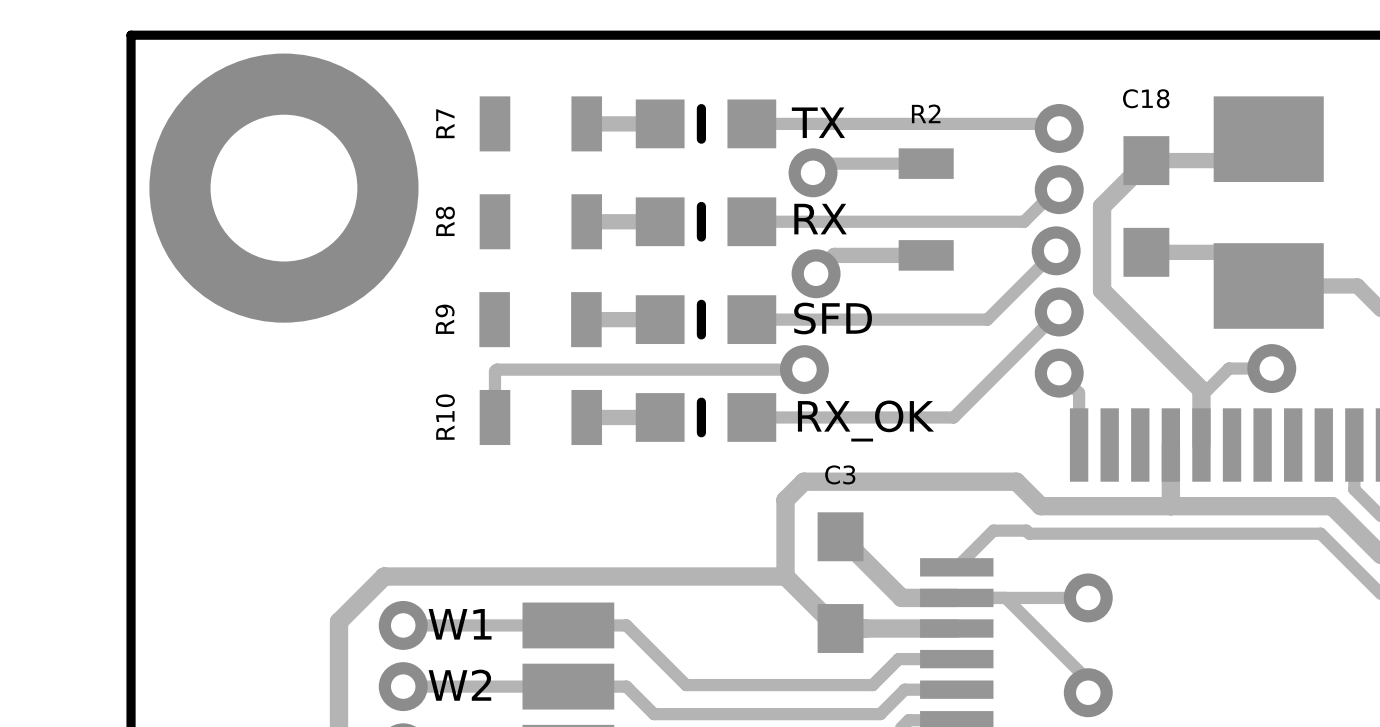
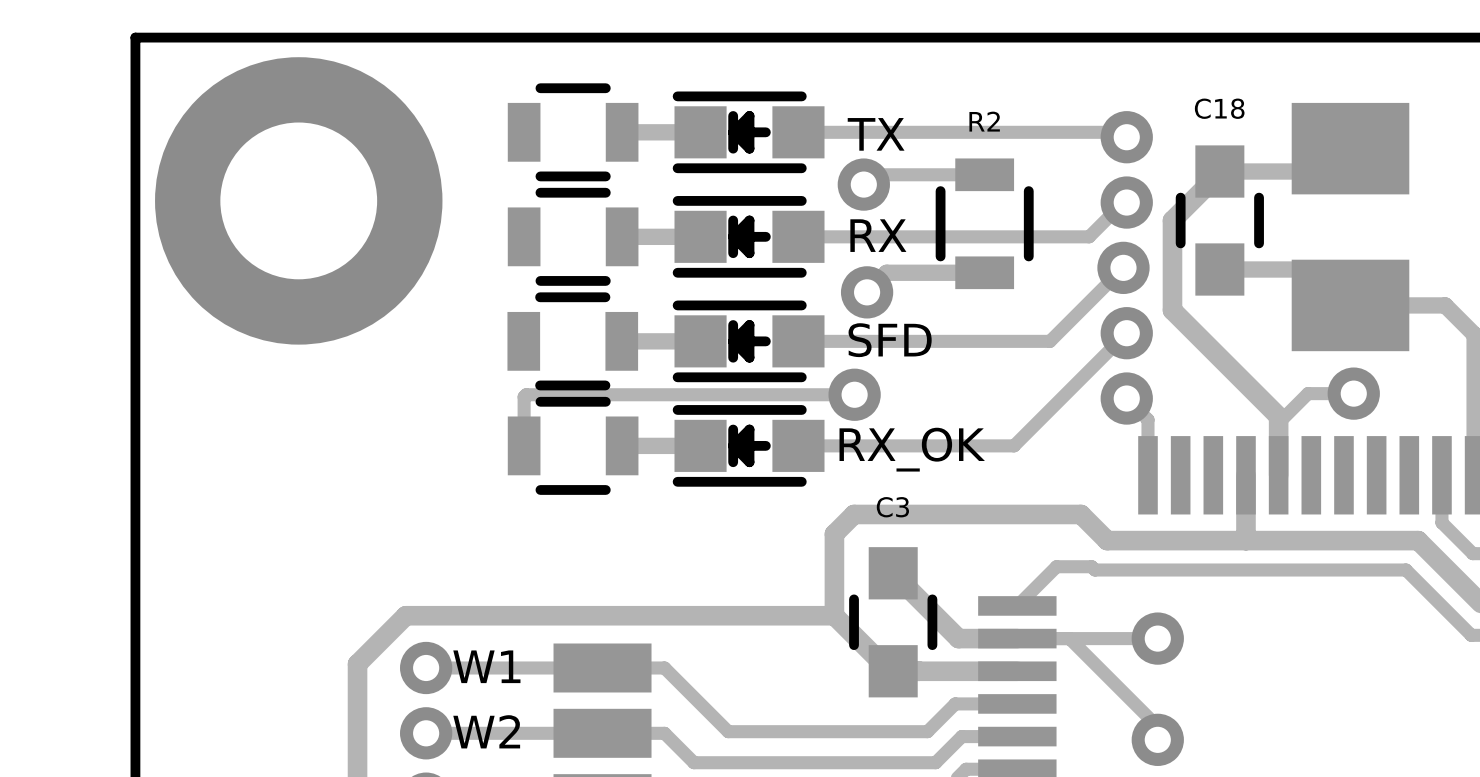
part footprint: [635, 99, 777, 149] -> [672, 91, 825, 174]
R7: (540, 123) -> none
part: none -> (573, 132)
C18 footprint: [1123, 136, 1170, 277] -> [1175, 145, 1264, 296]
R2 footprint: [898, 148, 954, 271] -> [935, 158, 1034, 290]
part footprint: [635, 197, 777, 247] -> [672, 196, 825, 278]
R8: (540, 221) -> none
part: none -> (573, 236)
part footprint: [635, 295, 777, 345] -> [672, 300, 825, 383]
R9: (540, 319) -> none
part: none -> (572, 341)
part footprint: [635, 393, 777, 442] -> [672, 405, 825, 487]
R10: (540, 417) -> none
part: none -> (573, 445)
C3 footprint: [817, 512, 864, 653] -> [849, 547, 938, 698]

